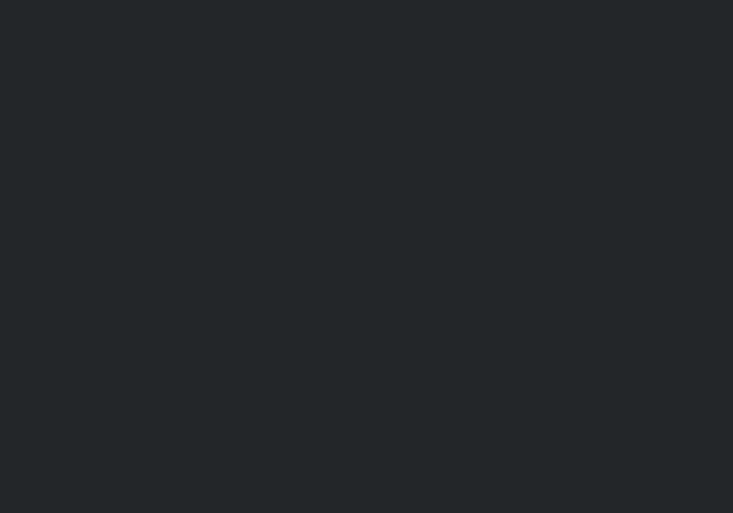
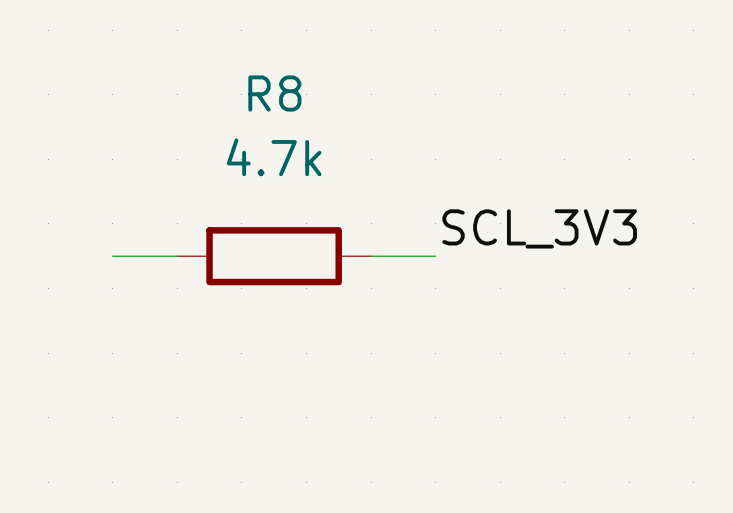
label: none -> SCL_3V3 (539, 228)
wire: none -> (112, 256) (177, 256)
R8: none -> 4.7k (274, 256)
wire: none -> (371, 256) (435, 256)

